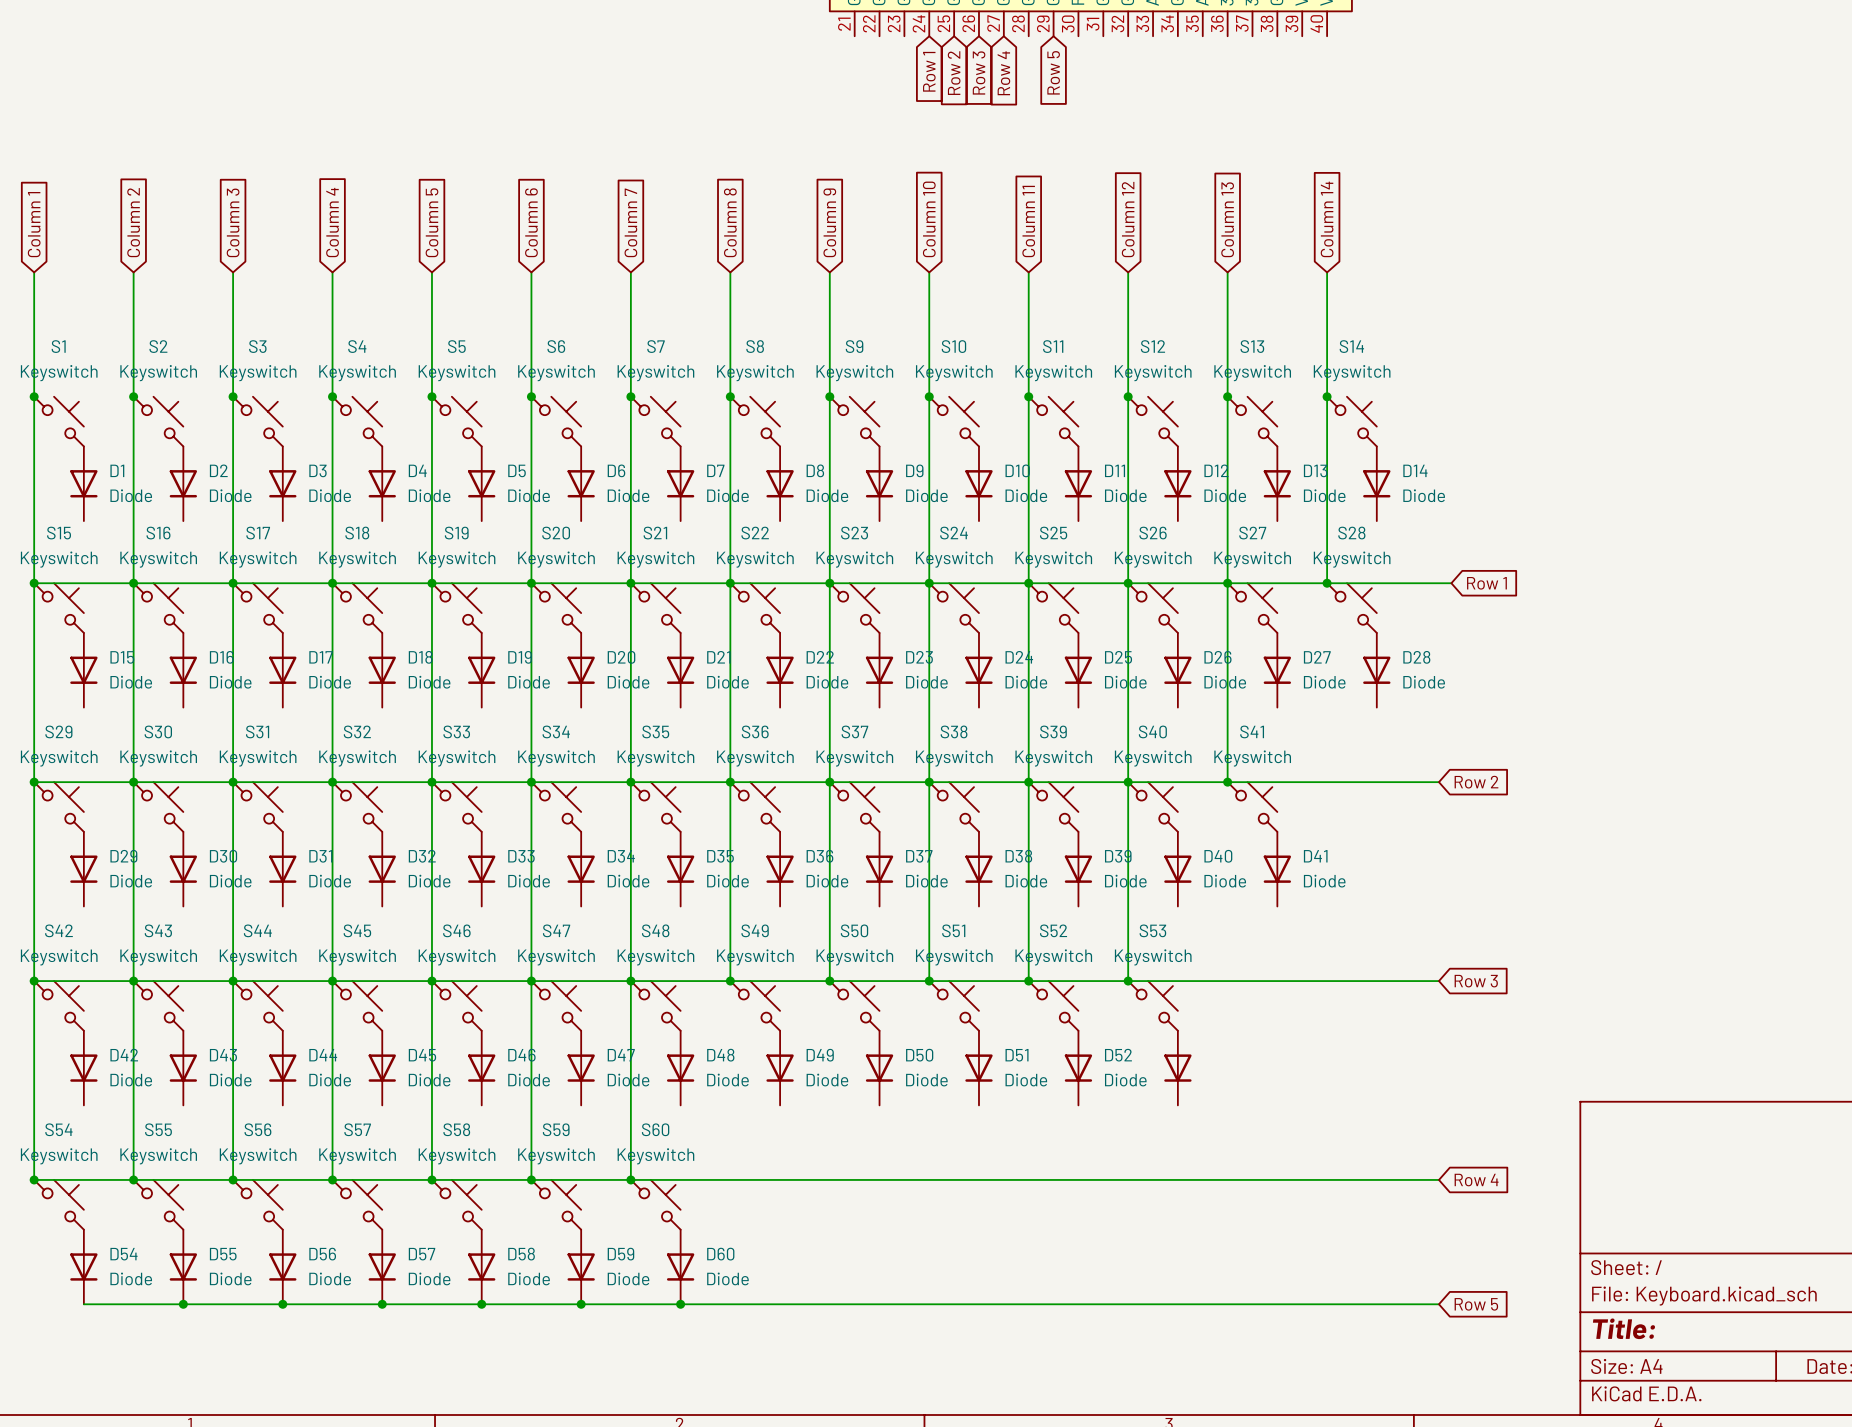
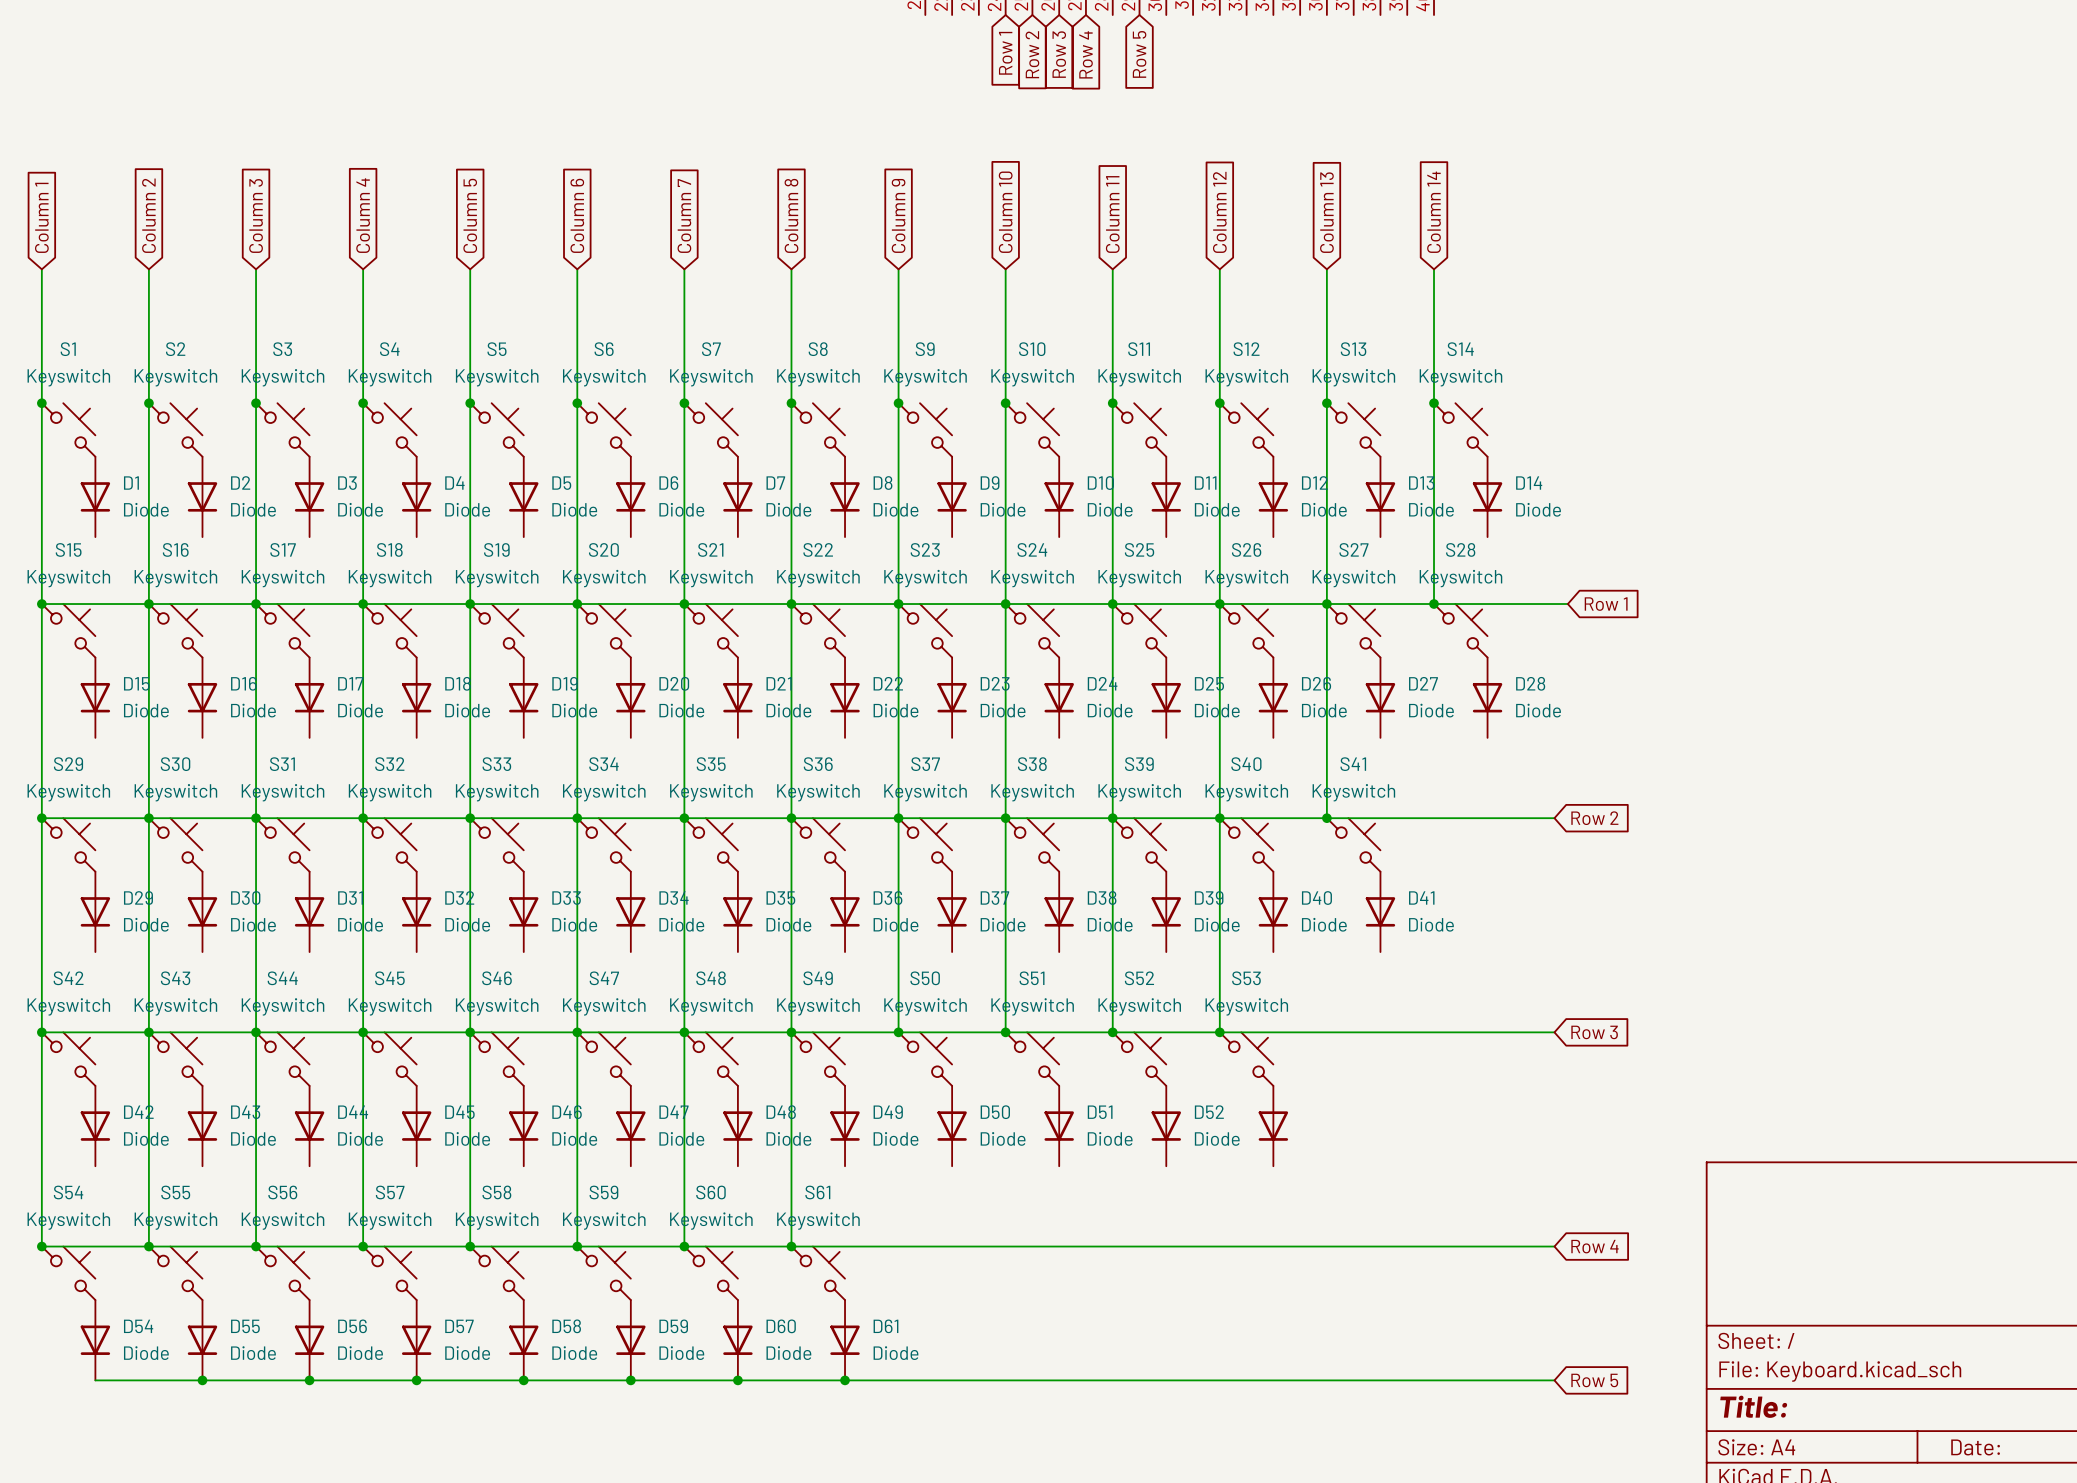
wire: none -> (791, 1032) (791, 1246)
junction: none -> (791, 1246)
S61: none -> Keyswitch (818, 1273)
D61: none -> Diode (845, 1340)
junction: none -> (845, 1380)

